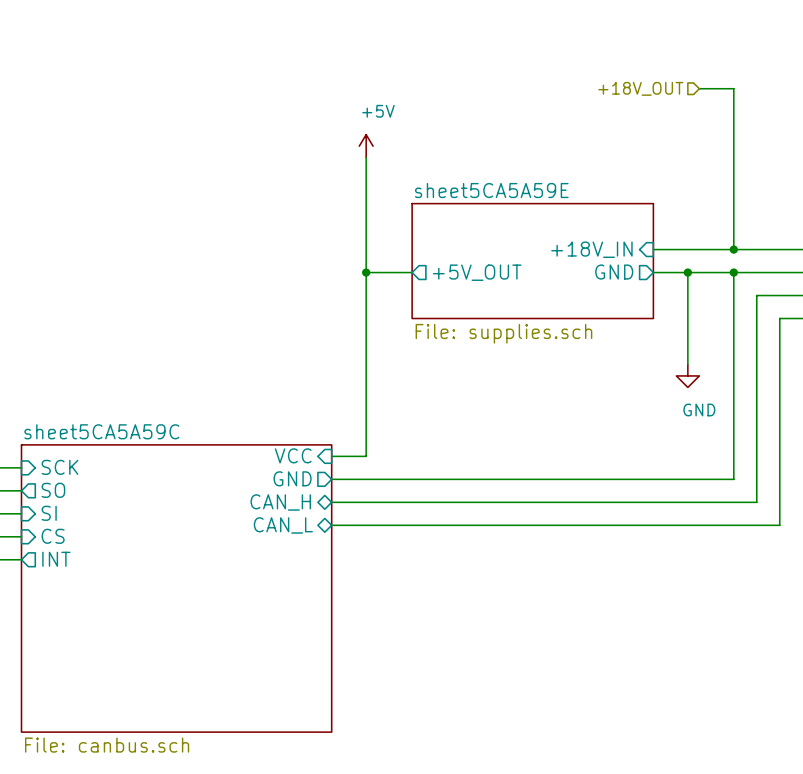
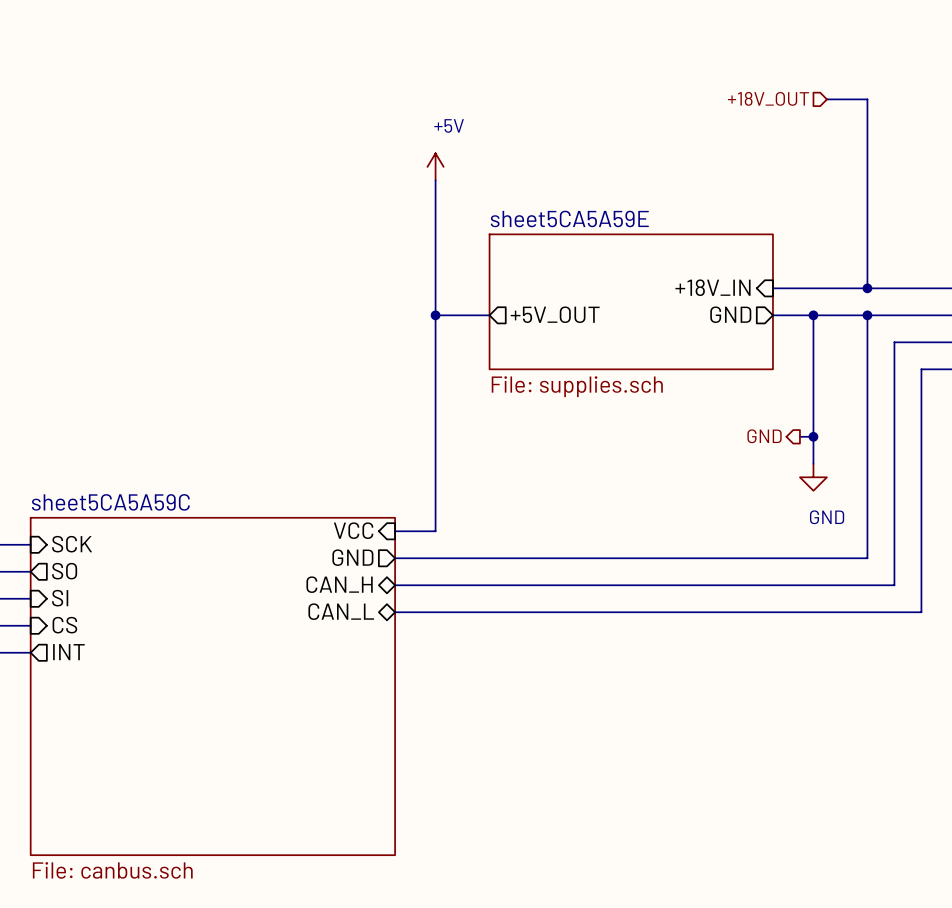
wire: none -> (813, 423) (813, 463)
hierarchical label: none -> GND (764, 436)
power symbol position: GND (687, 375) -> GND (813, 477)
junction: none -> (813, 436)

